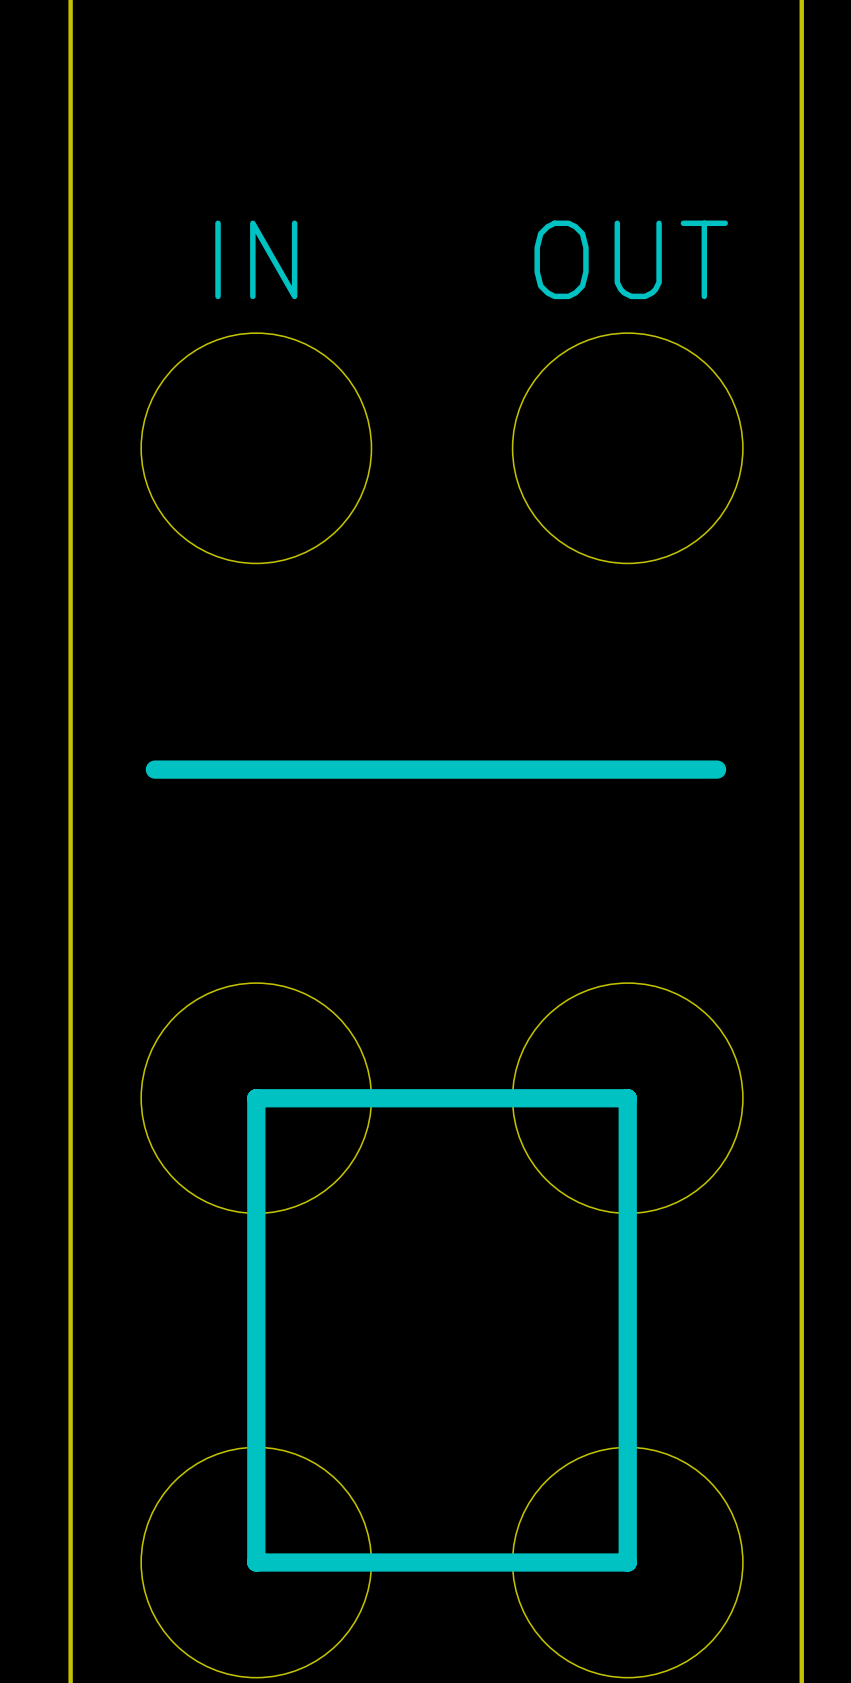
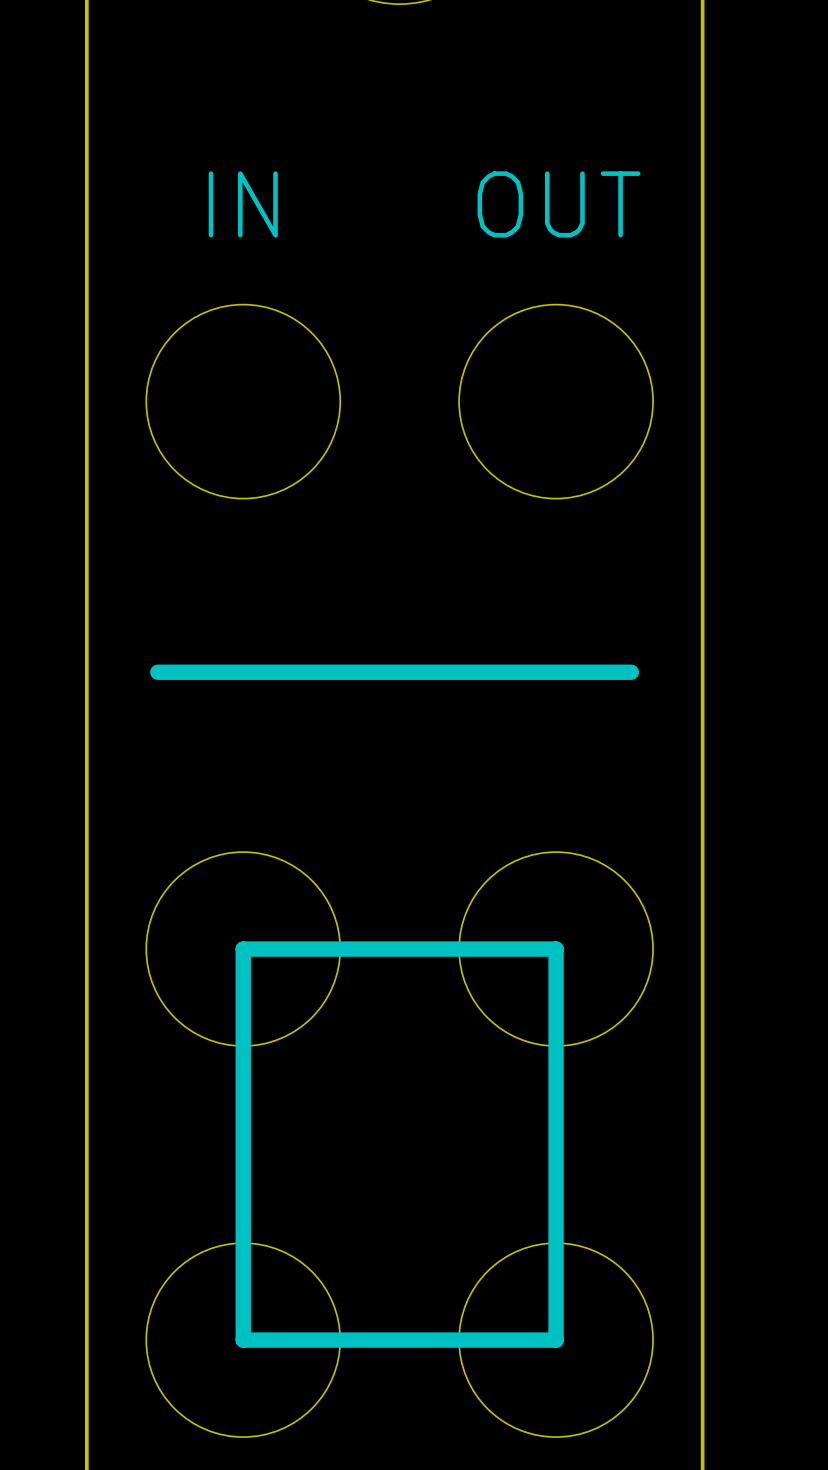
text position: IN (256, 259) -> IN (243, 204)
text position: OUT (631, 259) -> OUT (559, 204)

